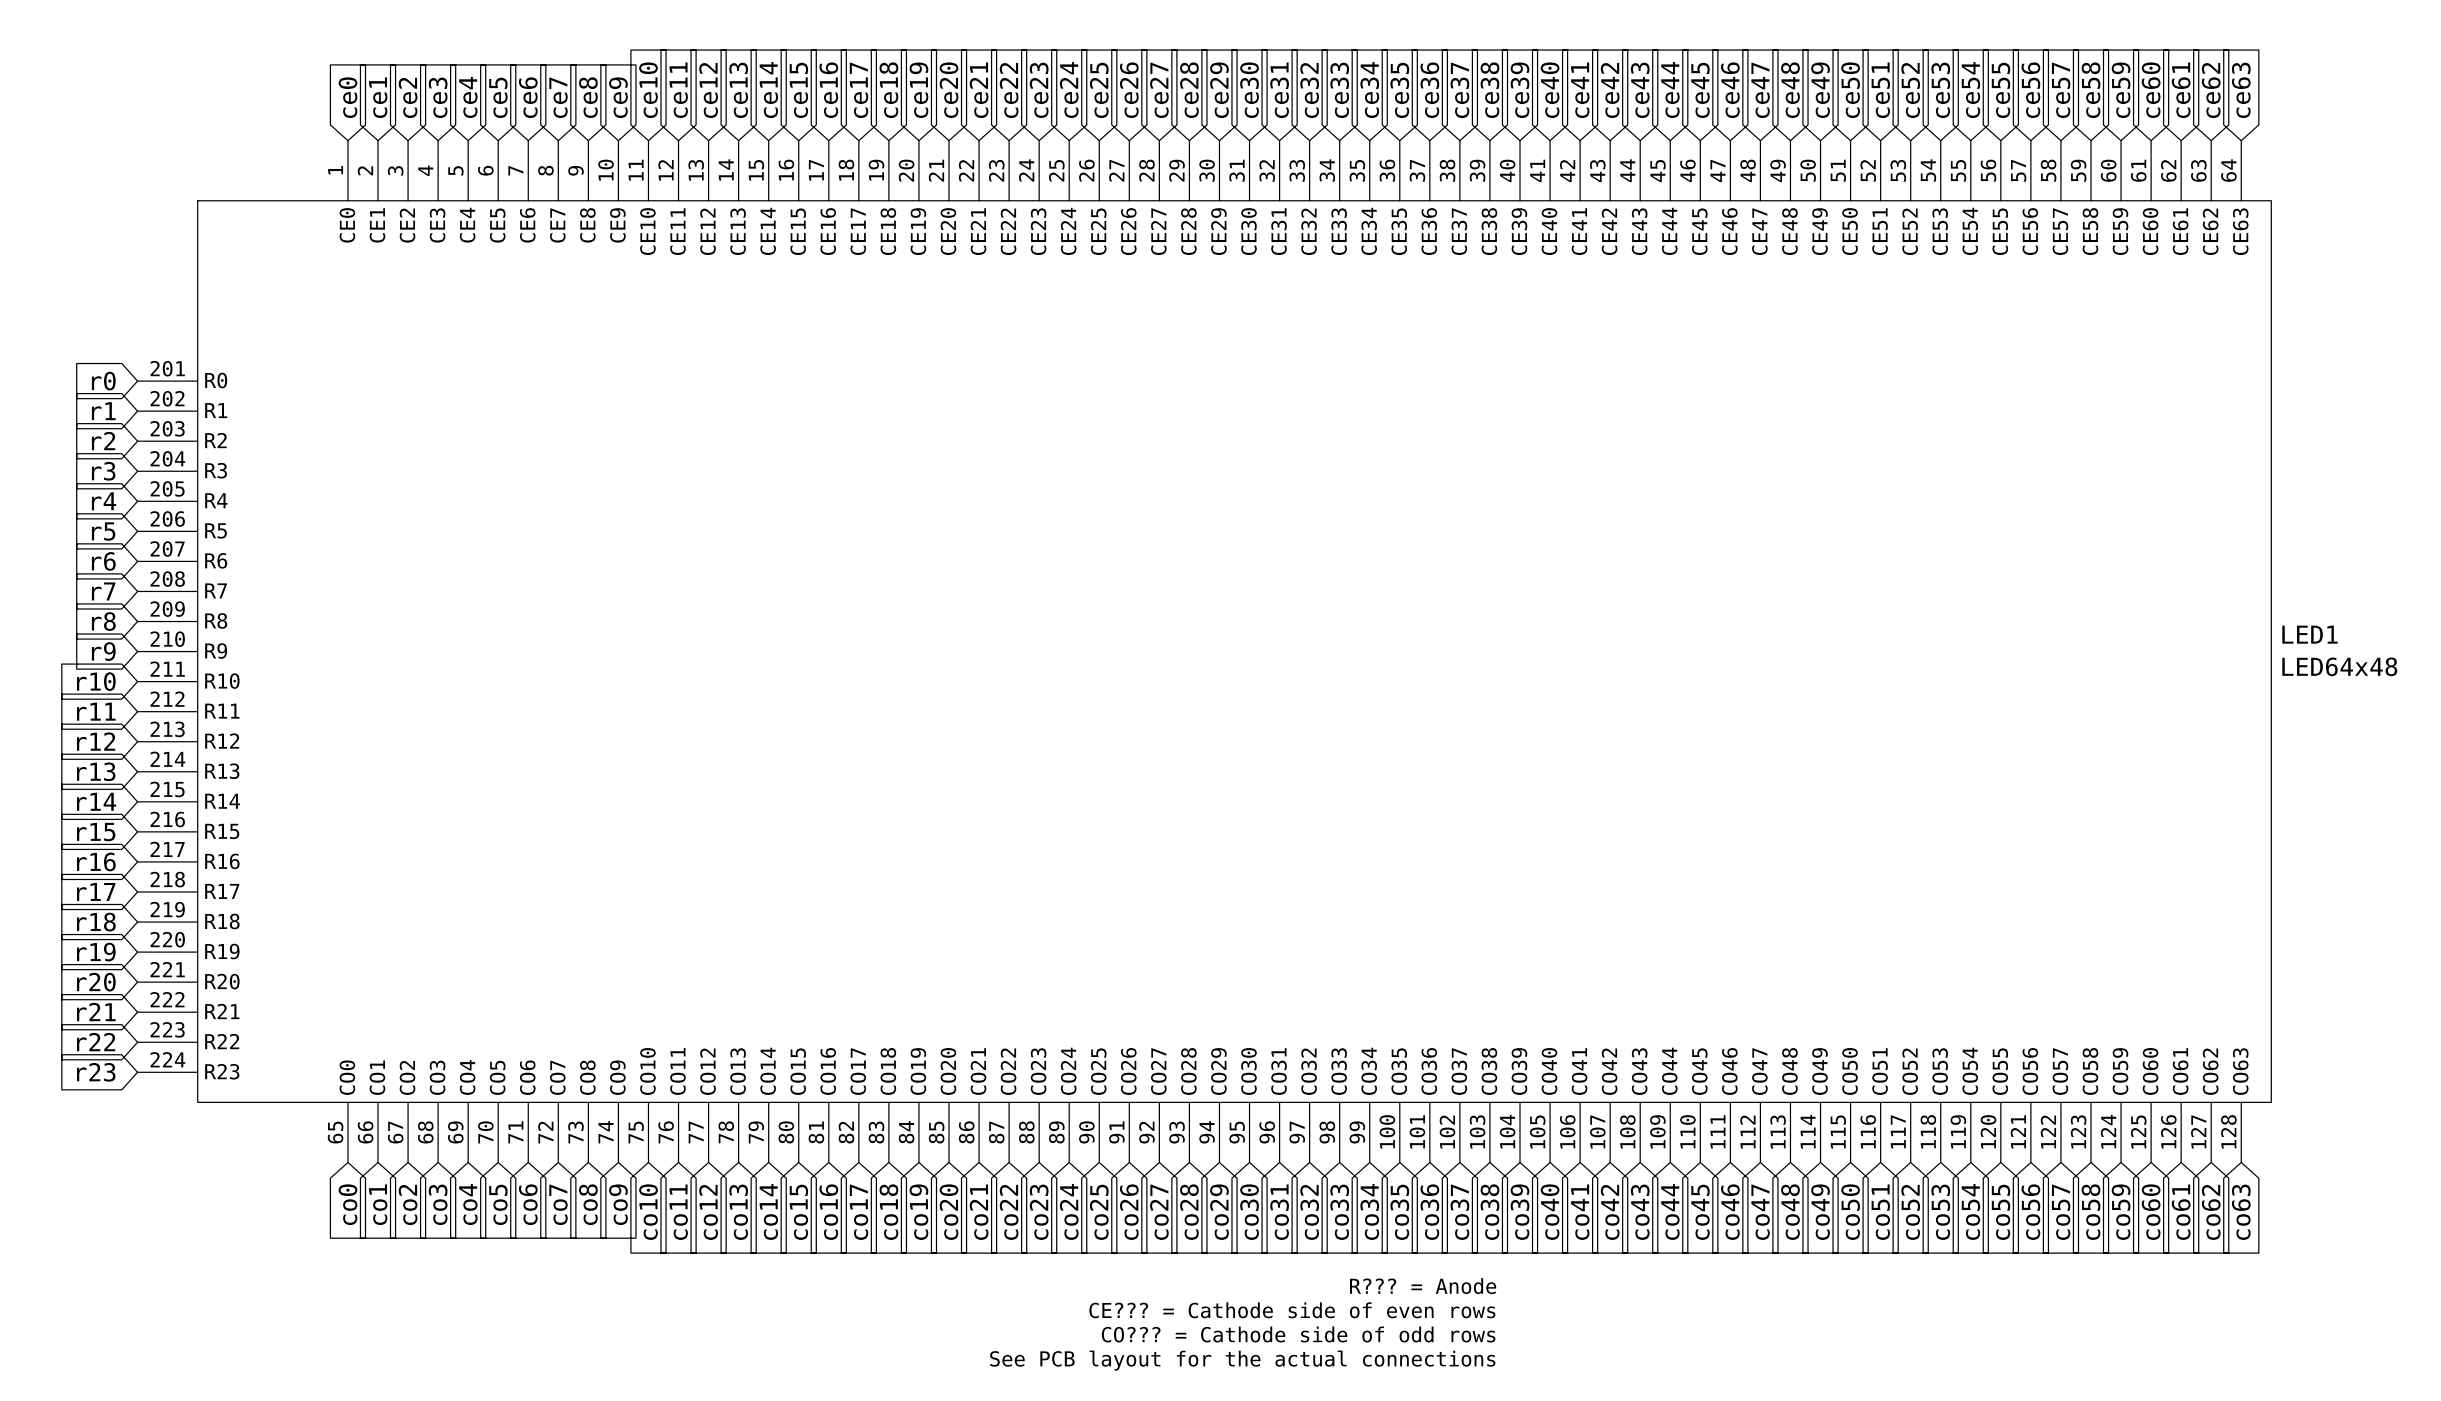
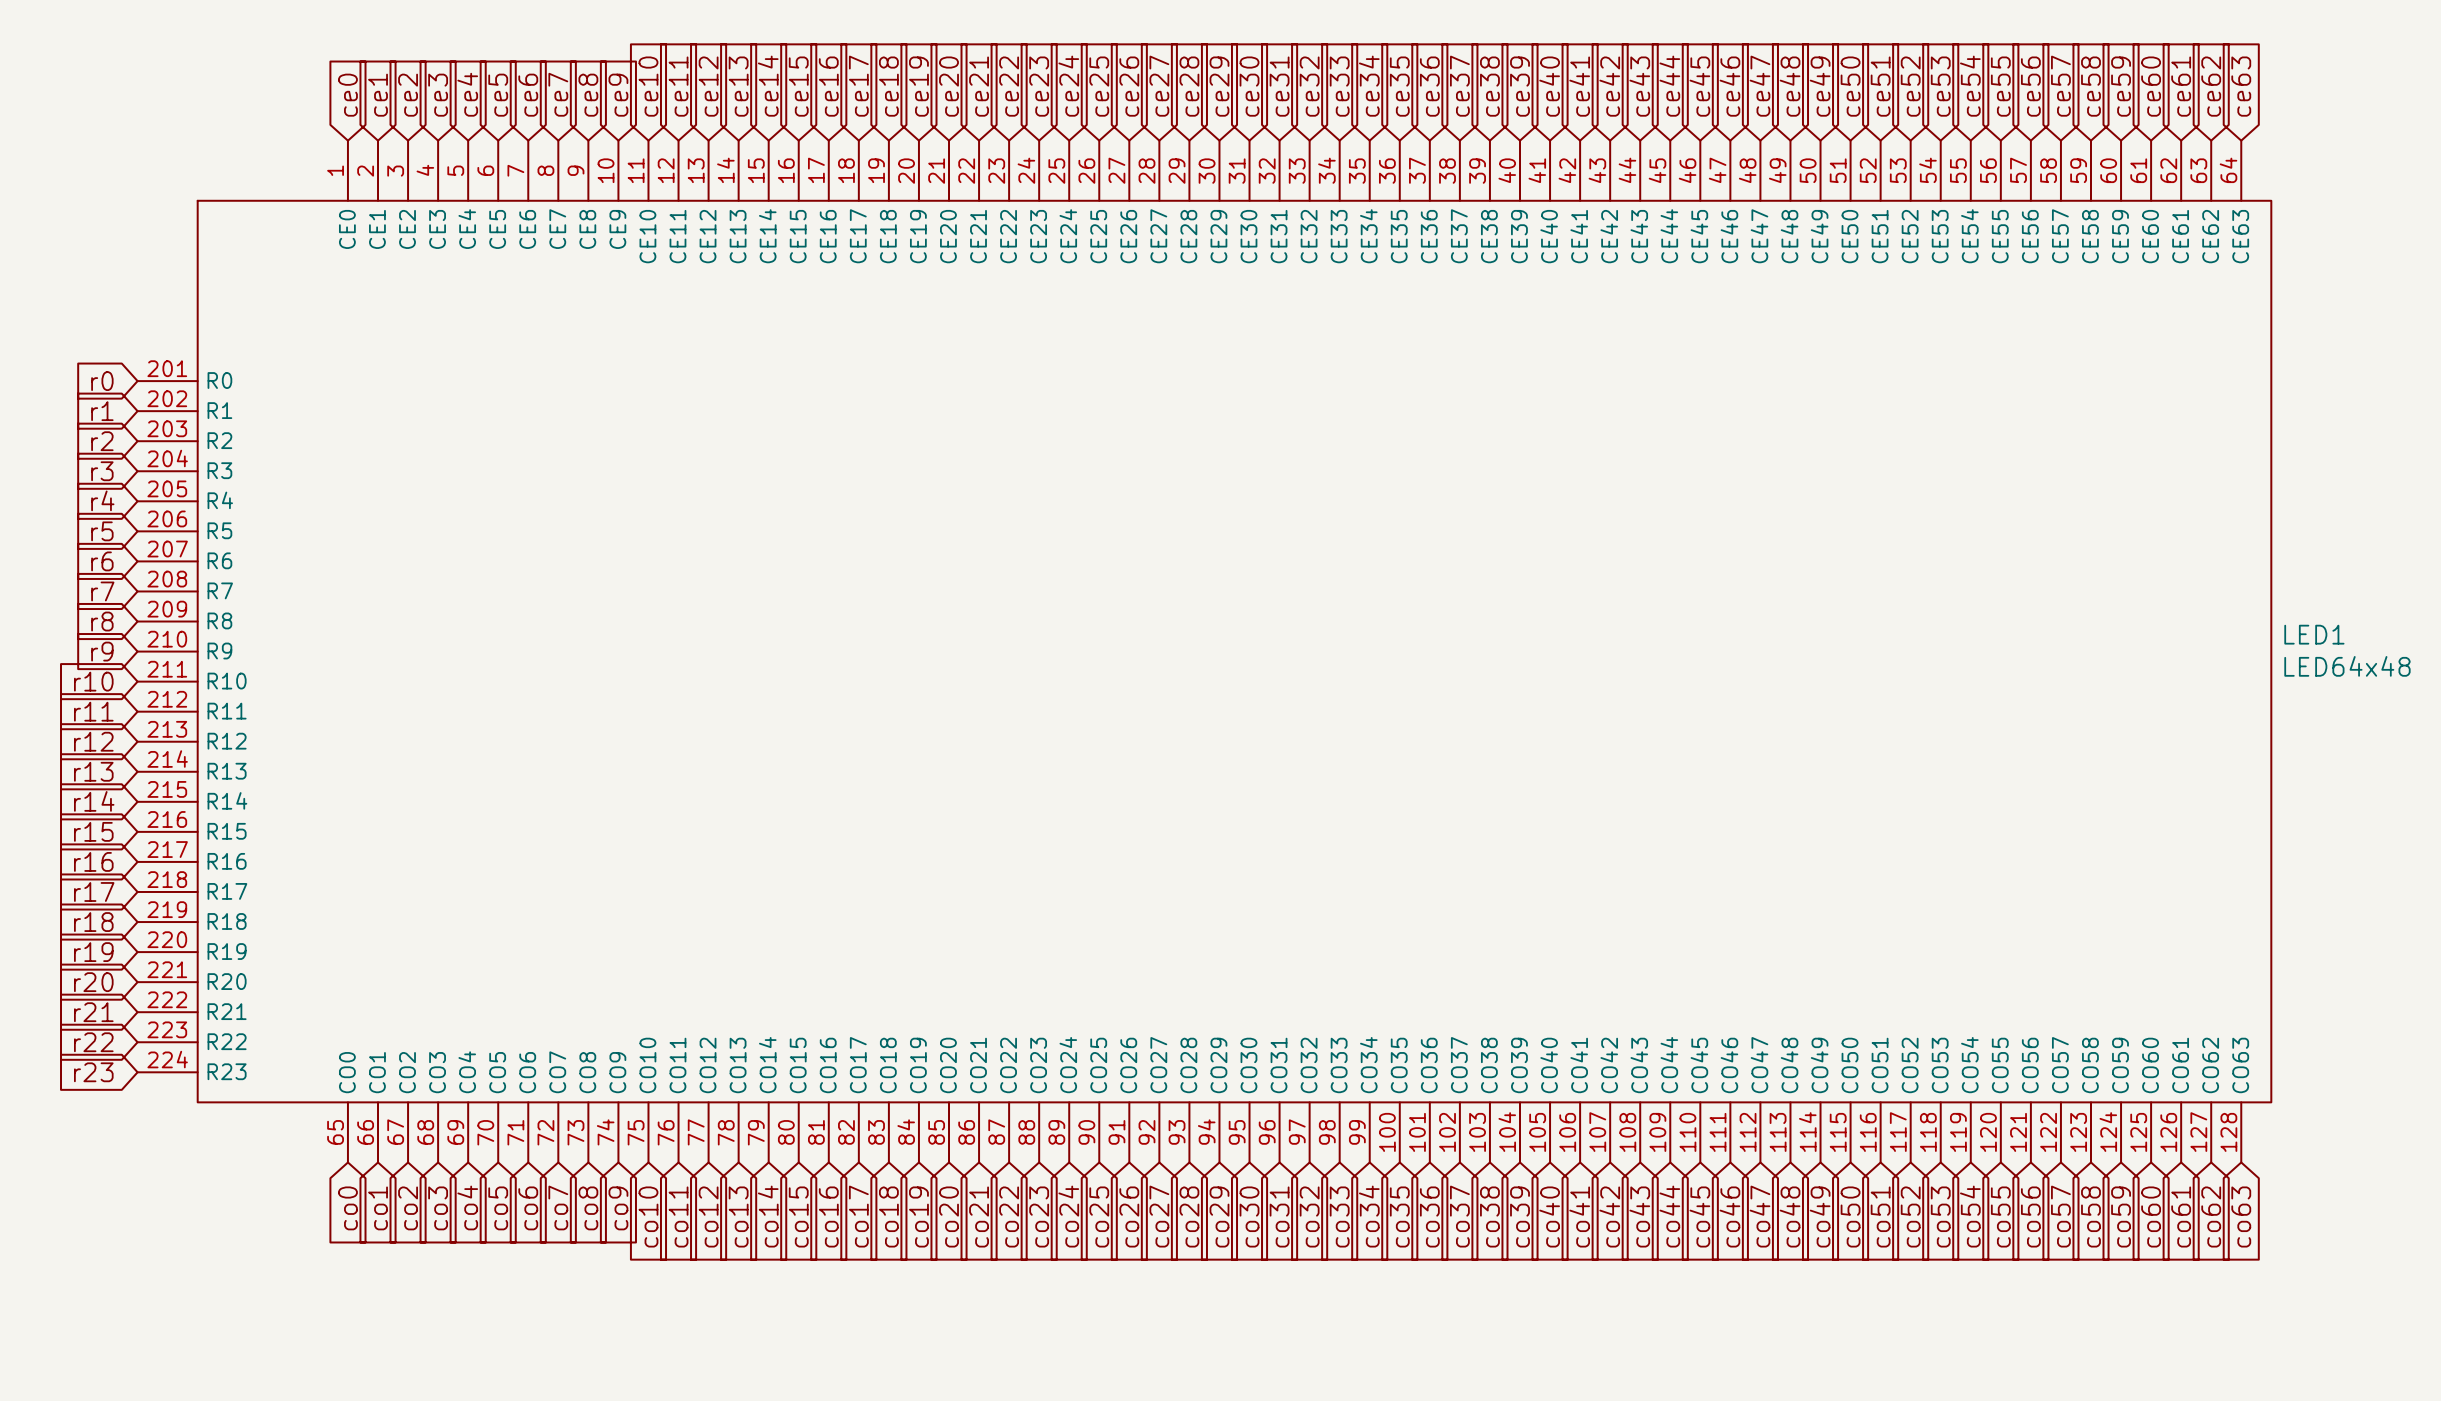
text: R??? = Anode (1423, 1286) -> none
text: CE??? = Cathode side of even rows (1292, 1310) -> none
text: CO??? = Cathode side of odd rows (1298, 1334) -> none
text: See PCB layout for the actual connections (1242, 1360) -> none

